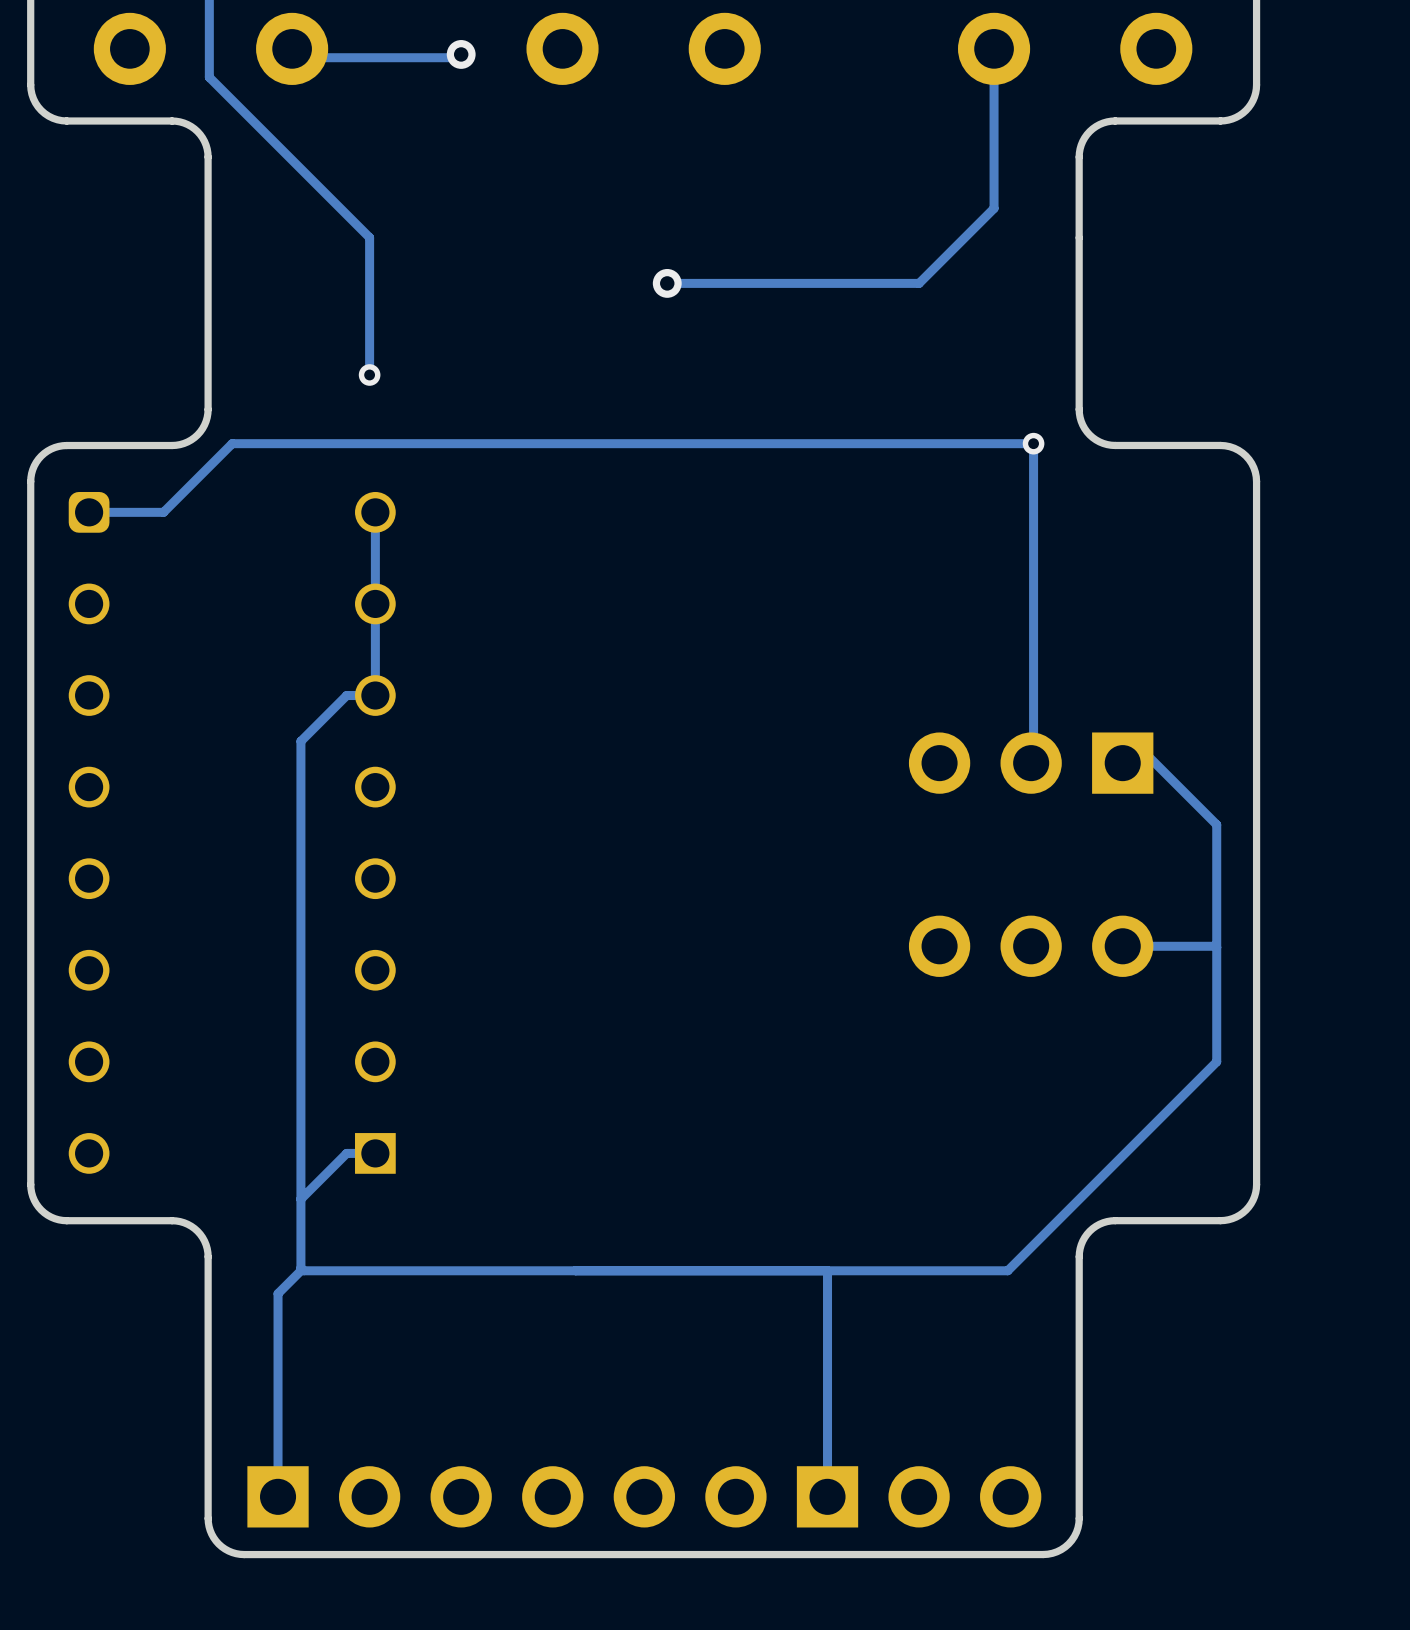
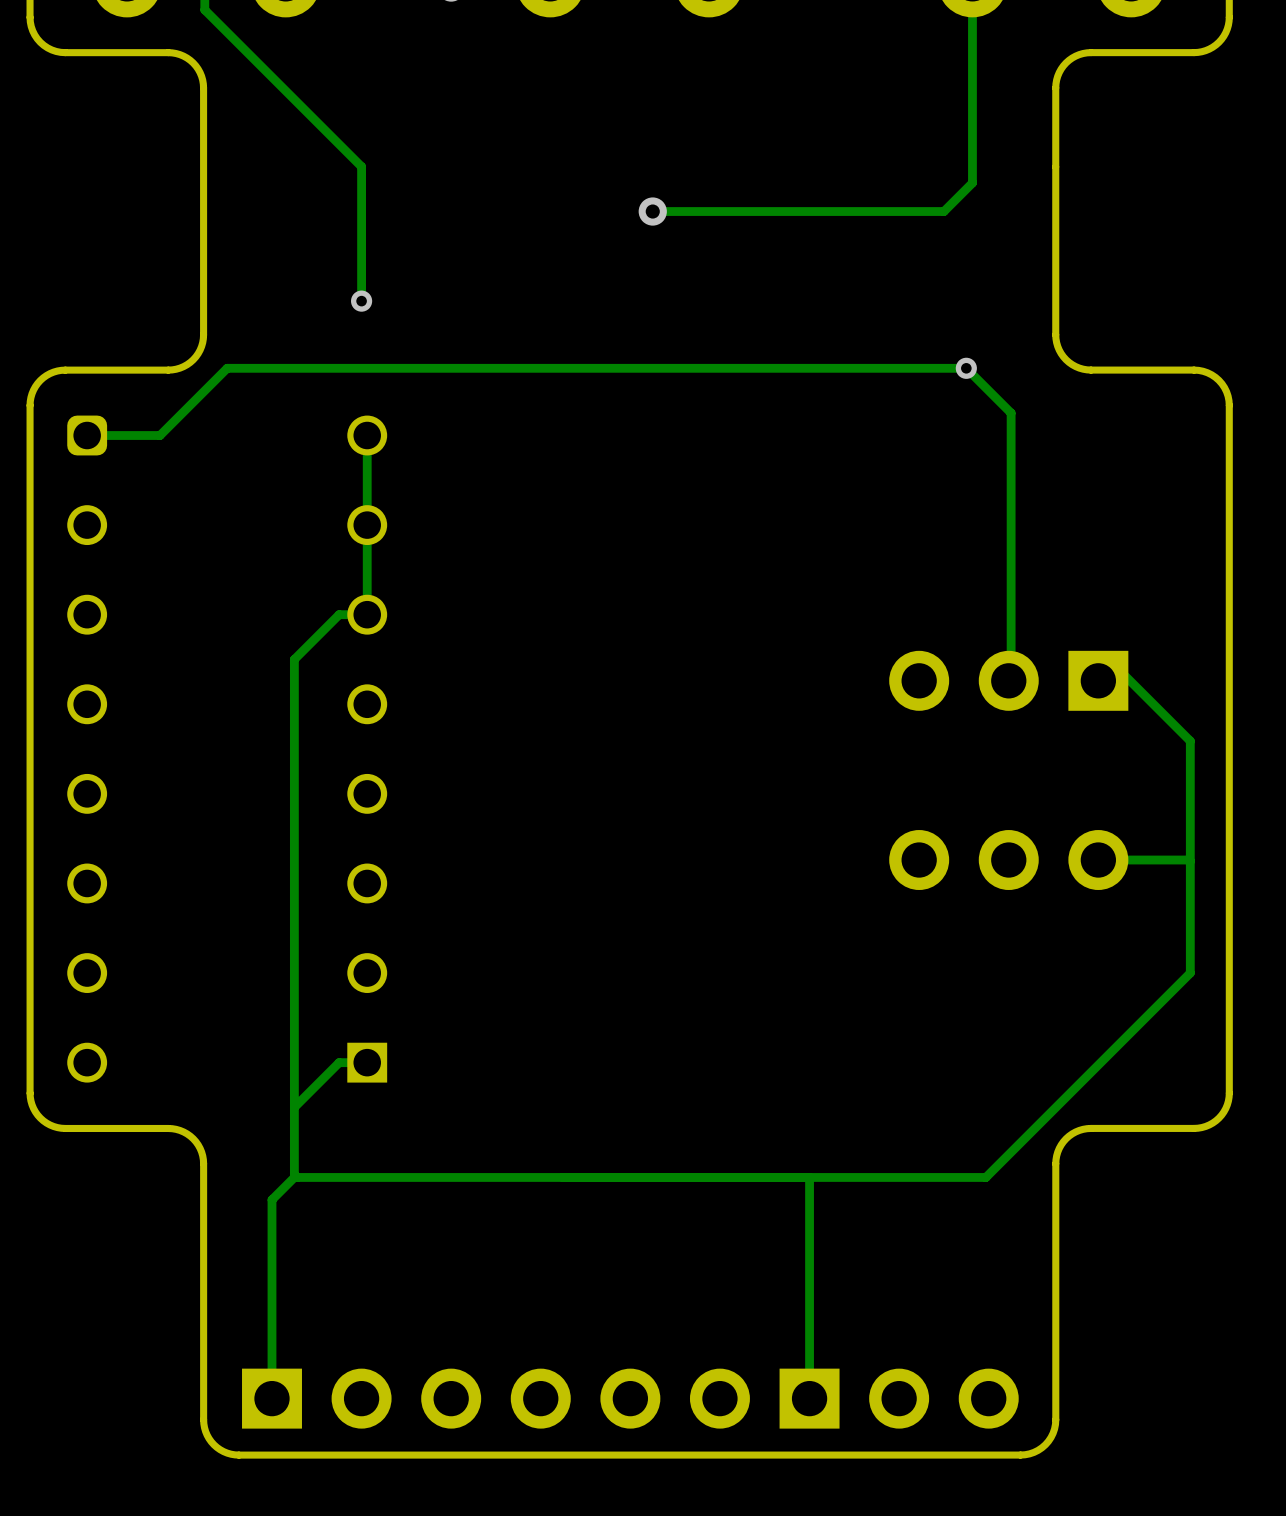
track: (994, 208) (919, 283) -> (972, 138) (972, 182) (943, 211) (899, 211)
track: (987, 443) (1033, 443) (1033, 489) -> (966, 368) (1011, 413)
via position: (1033, 443) -> (966, 368)

